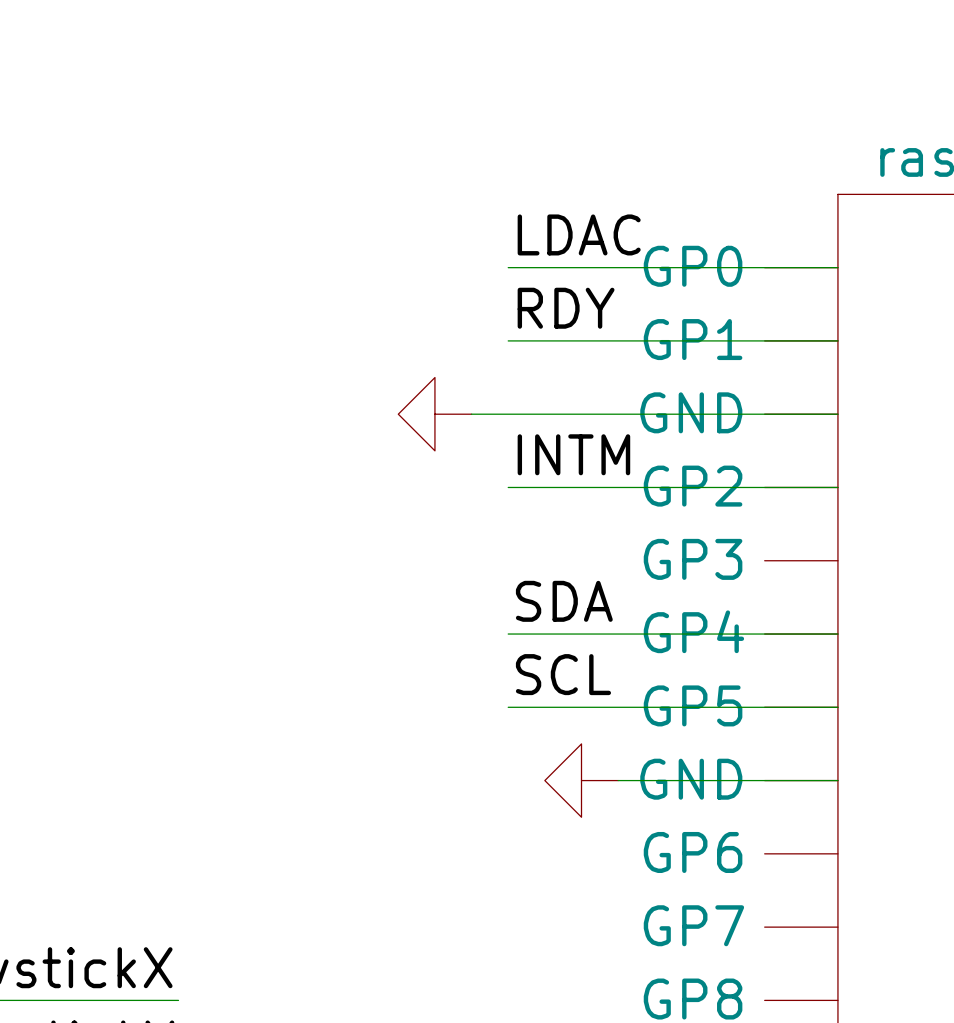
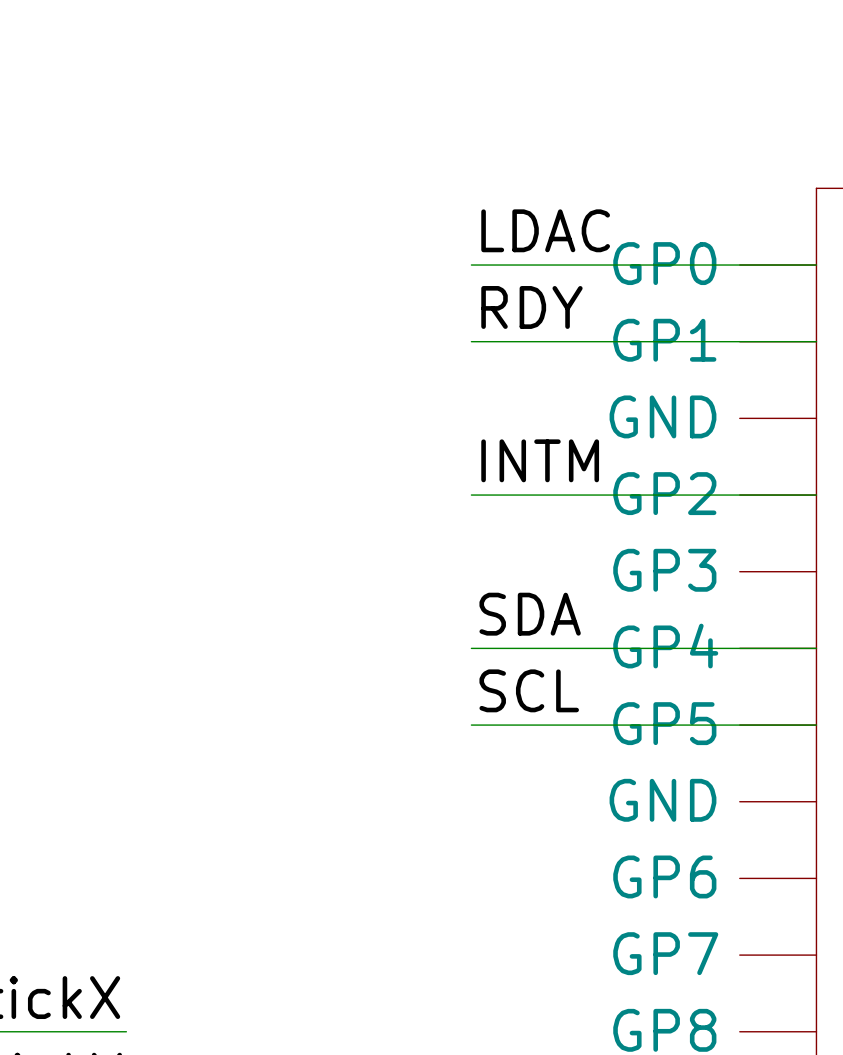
power symbol: (434, 414) -> none
wire: (471, 414) (837, 414) -> none
power symbol: (581, 780) -> none
wire: (618, 780) (837, 780) -> none

